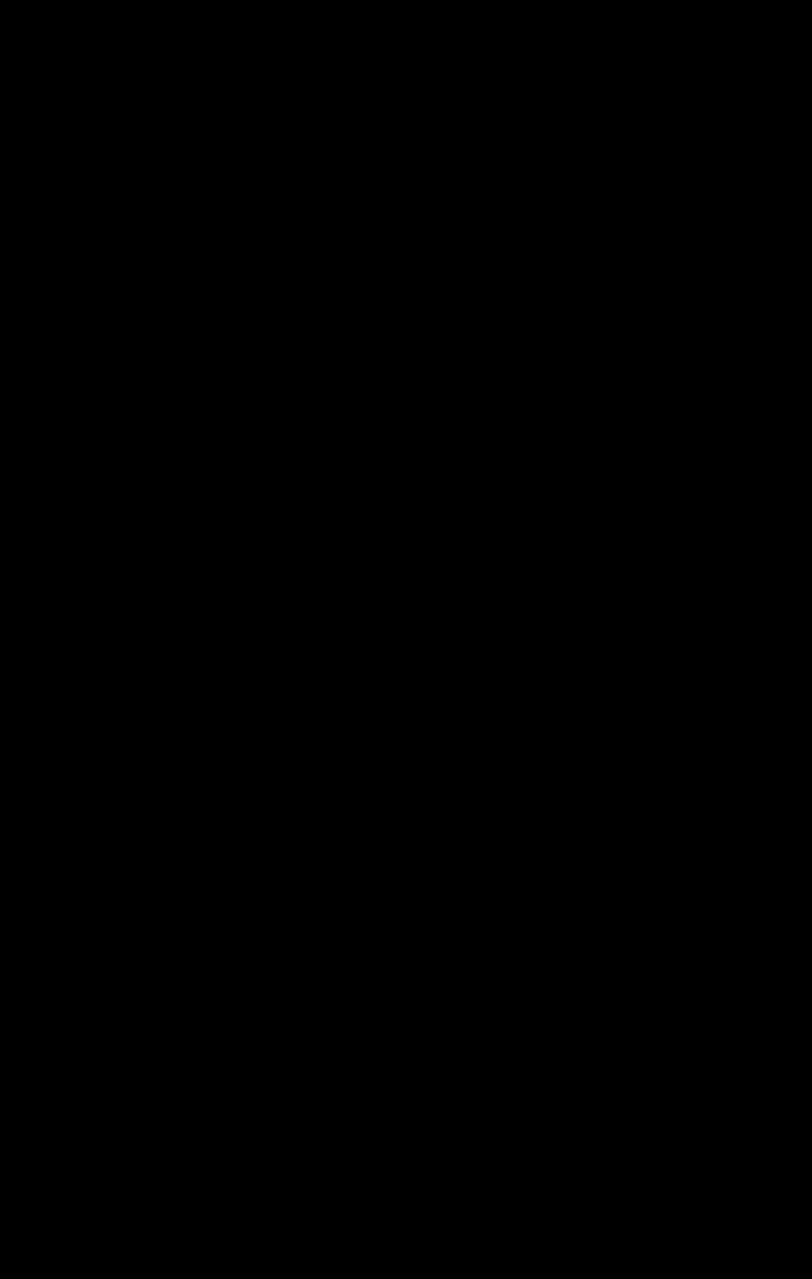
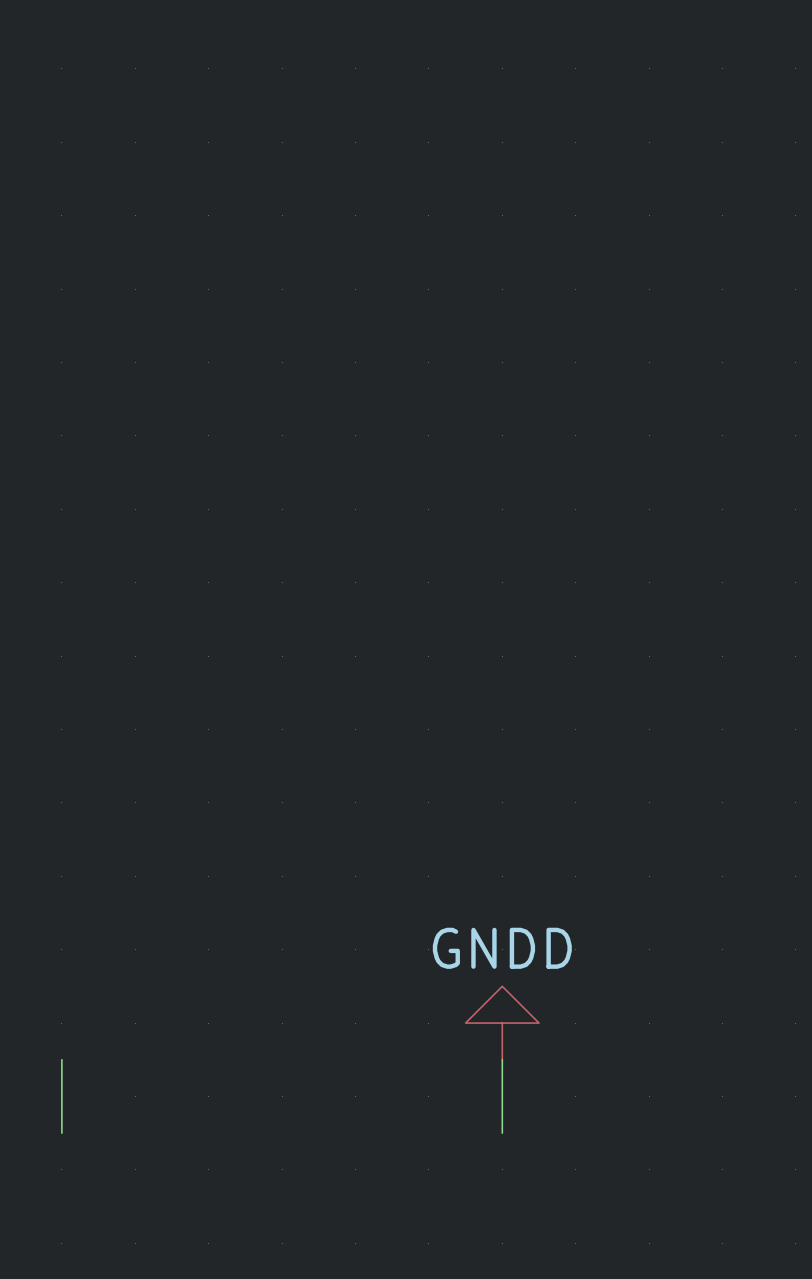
power symbol: none -> GNDD (502, 1023)
wire: none -> (61, 1059) (61, 1133)
wire: none -> (502, 1059) (502, 1133)

